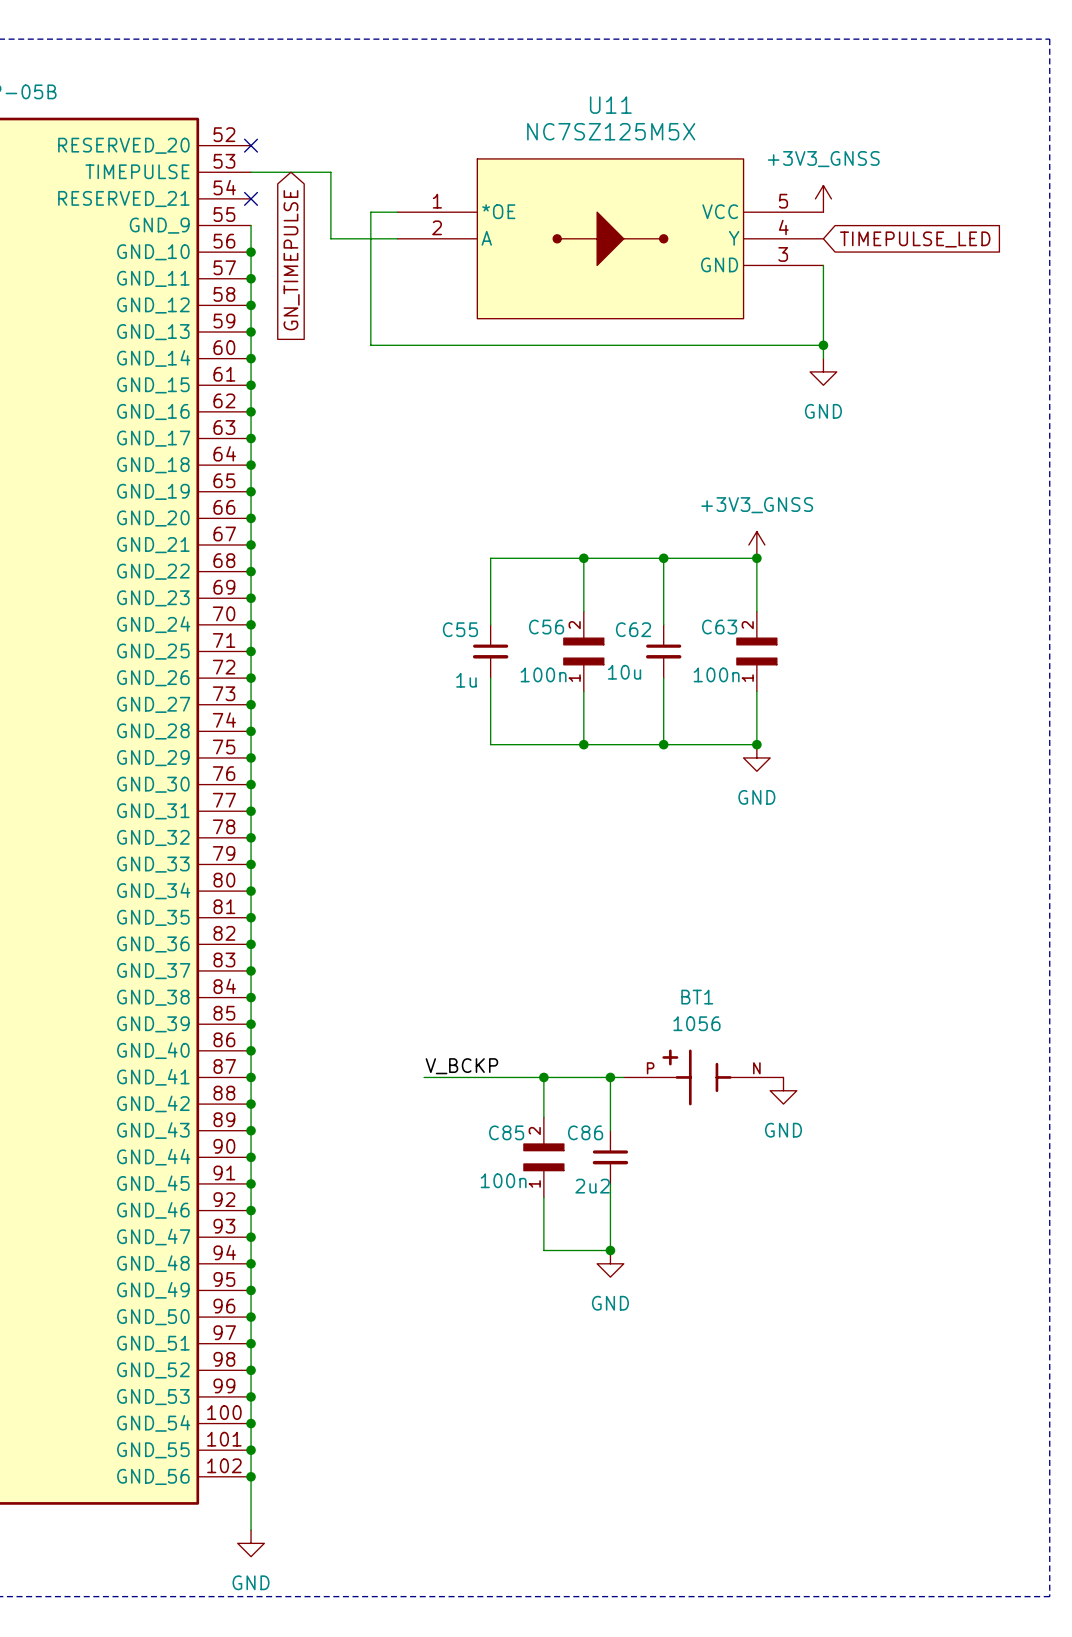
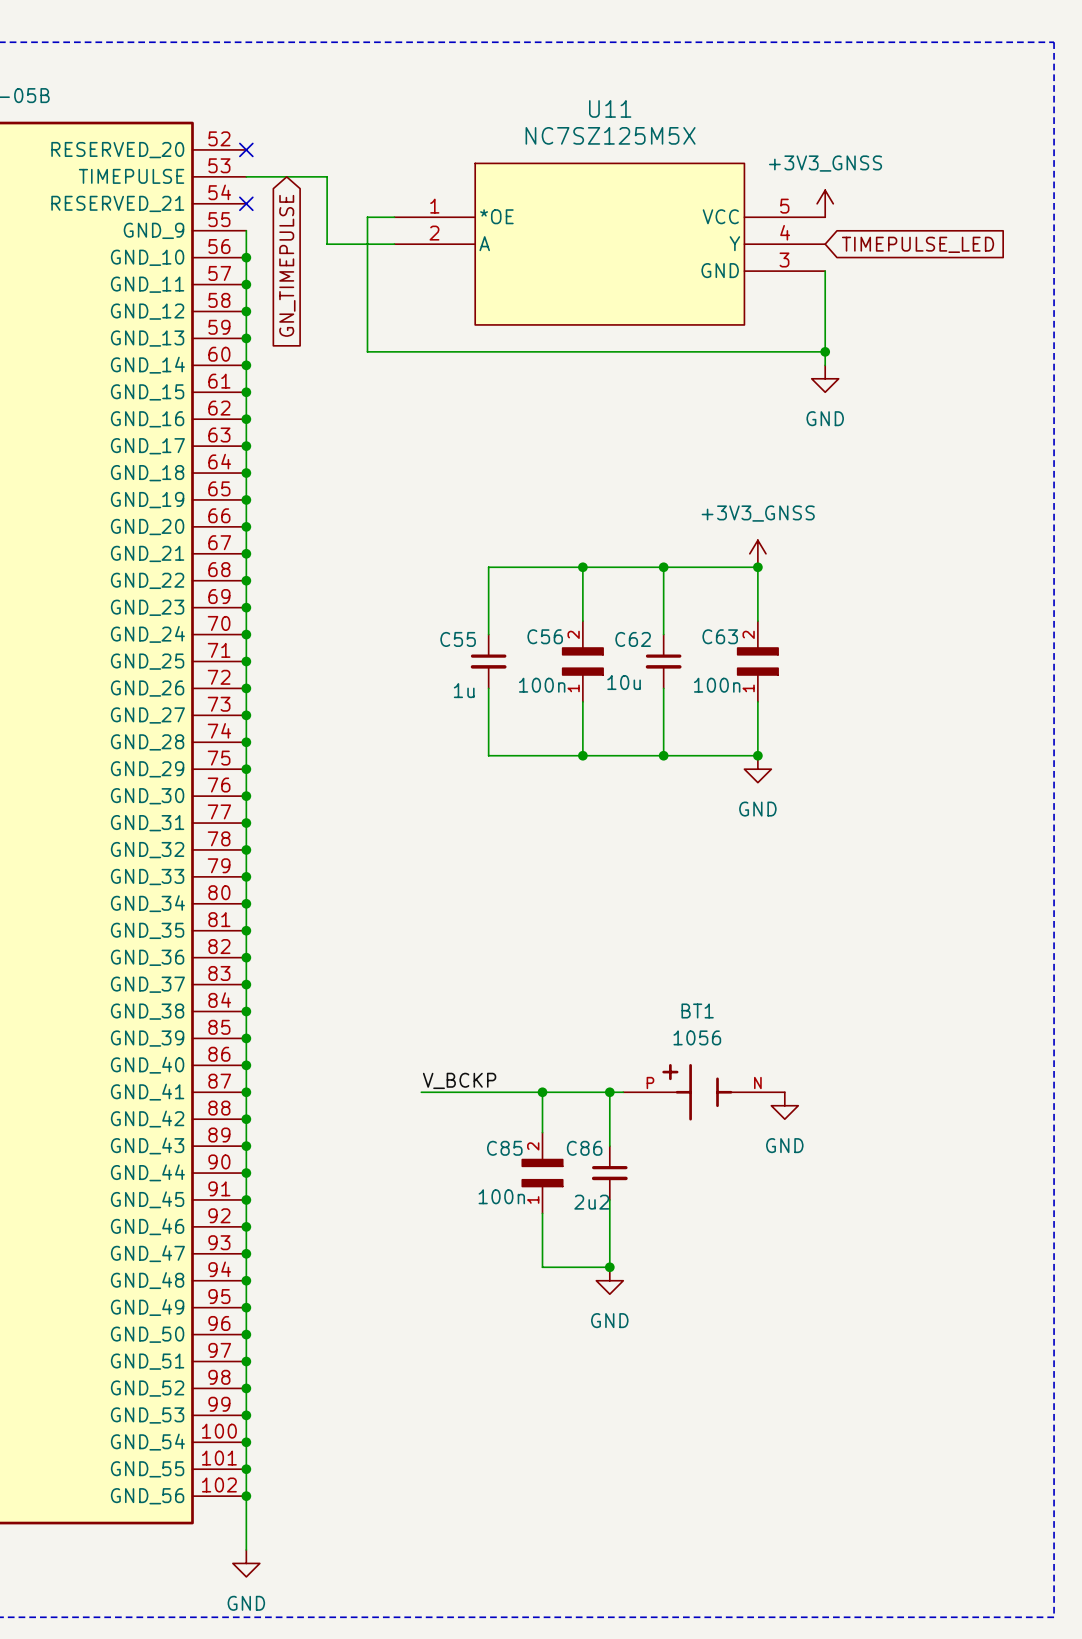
U11 symbol: [397, 158, 824, 319] -> [394, 163, 826, 325]

